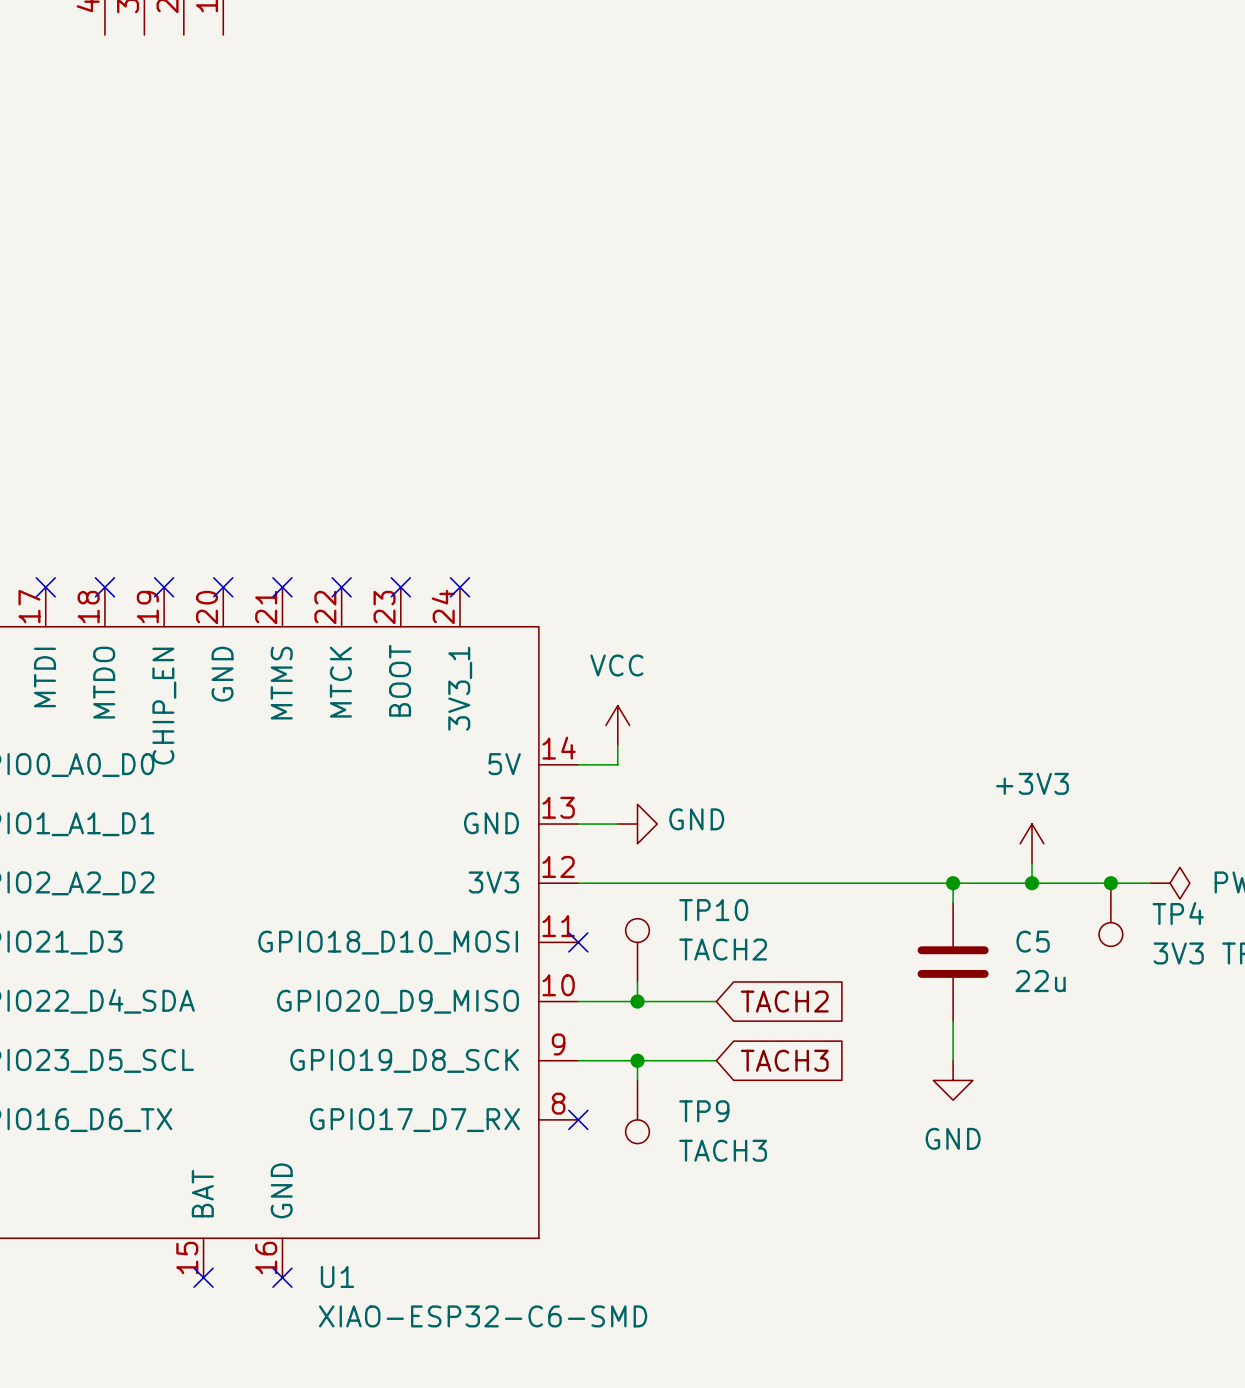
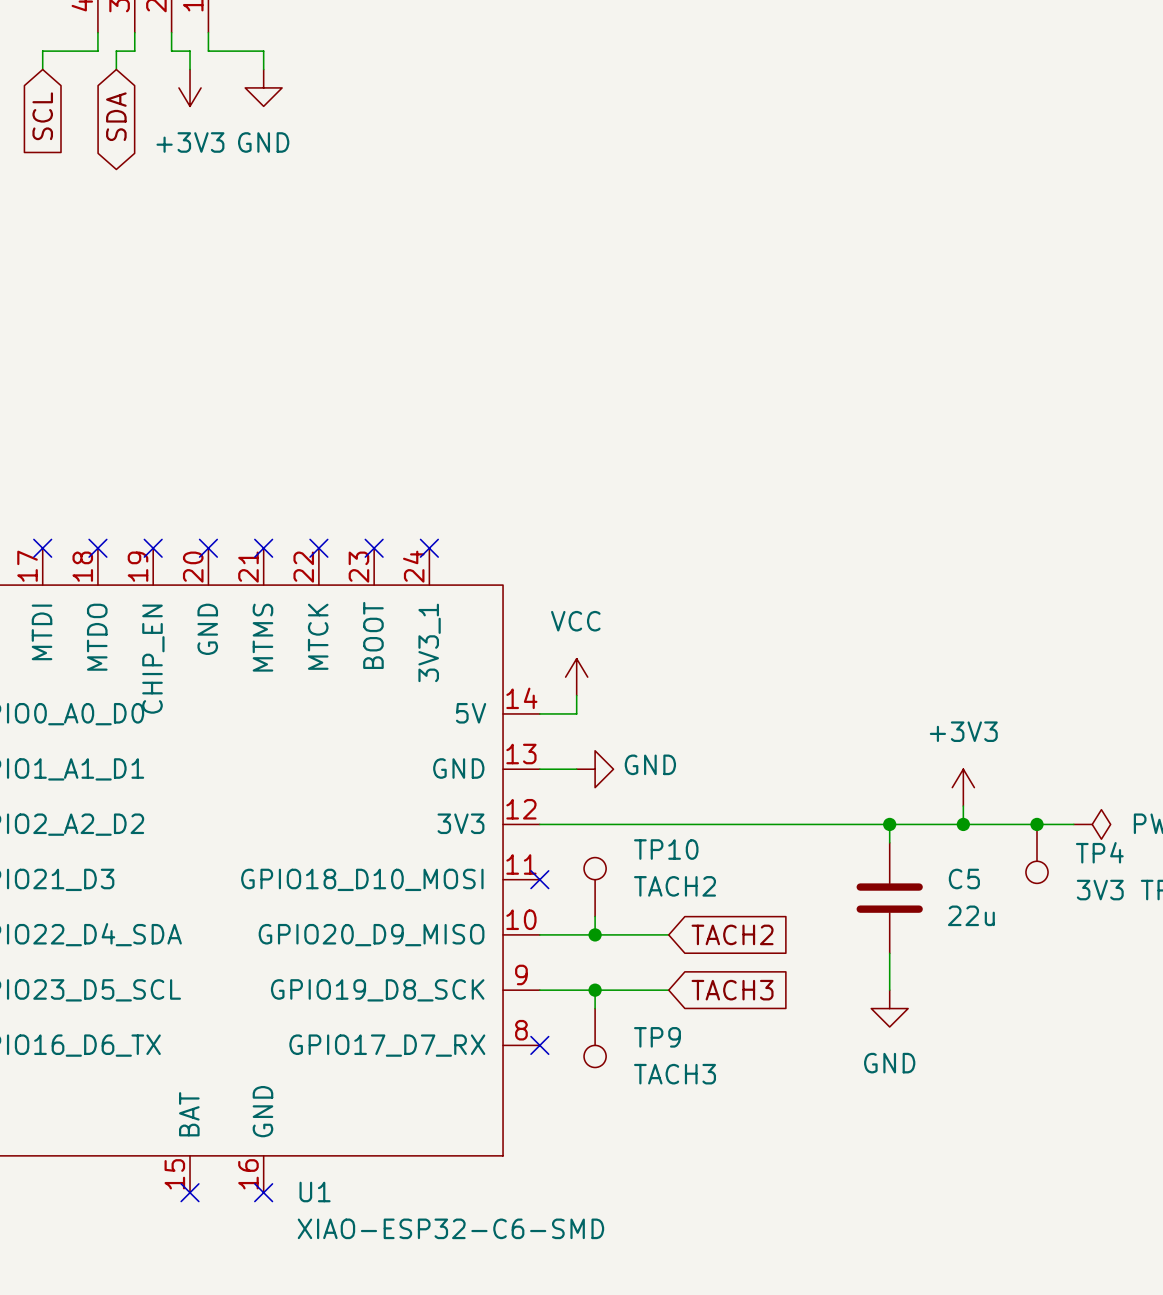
wire: none -> (97, 32) (97, 51) (42, 51) (42, 69)
wire: none -> (134, 32) (134, 51) (116, 51) (116, 69)
wire: none -> (171, 32) (171, 51) (190, 51) (190, 69)
wire: none -> (208, 32) (208, 51) (263, 51) (263, 69)
power symbol: none -> +3V3 (190, 87)
power symbol: none -> GND (263, 87)
global label: none -> SCL (42, 116)
global label: none -> SDA (116, 116)

